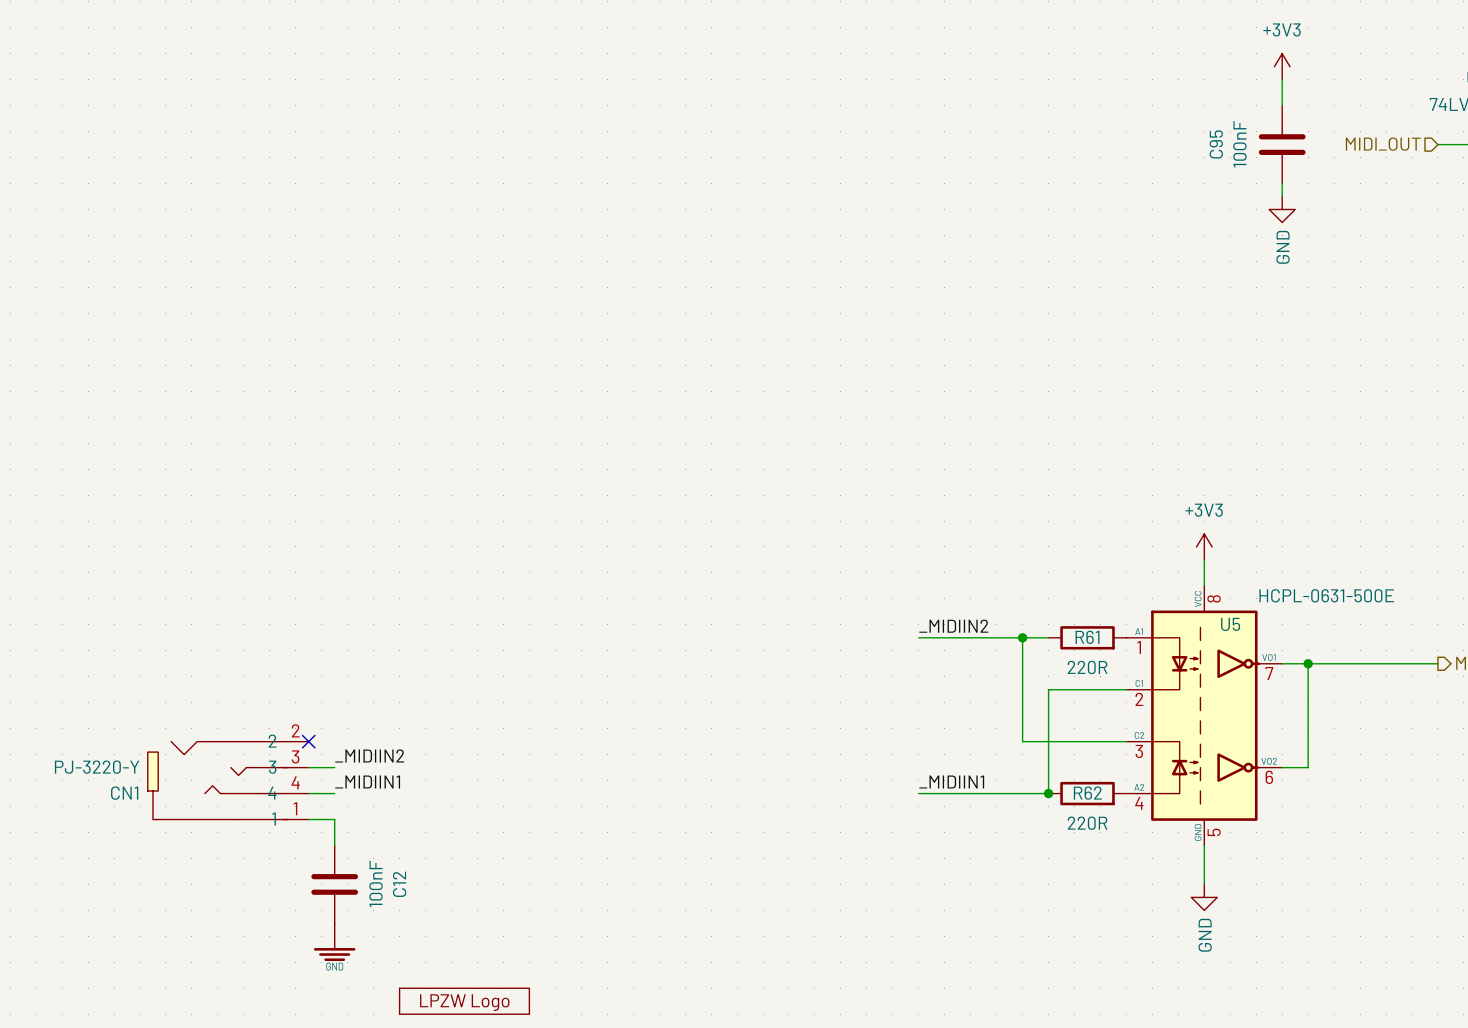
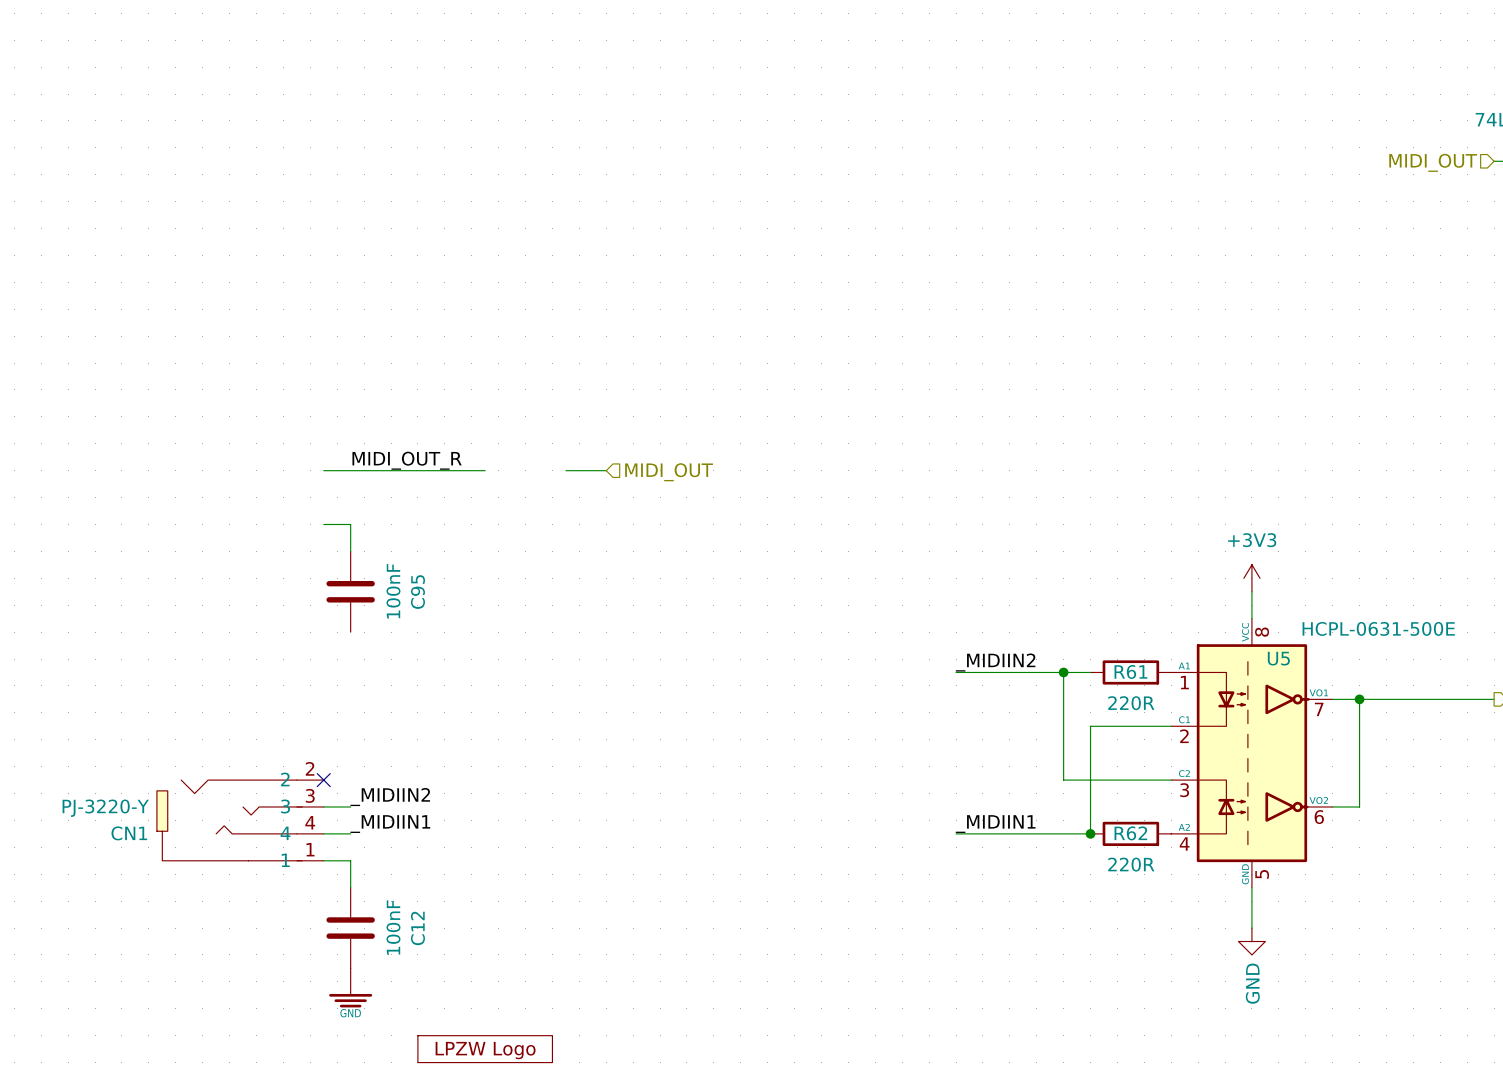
power symbol: +3V3 (1282, 66) -> none
wire: (1282, 79) (1282, 105) -> none
C95 name position: C95 (1216, 144) -> C95 (417, 592)
C95 value position: 100nF (1239, 144) -> 100nF (393, 591)
C95 position: (1282, 144) -> (350, 591)
wire: (1282, 183) (1282, 196) -> none
power symbol: GND (1282, 209) -> none
label: none -> MIDI_OUT_R (407, 460)
hierarchical label: none -> MIDI_OUT (669, 472)
wire: none -> (323, 470) (485, 470)
wire: none -> (565, 470) (606, 470)
wire: none -> (323, 524) (350, 524) (350, 551)

